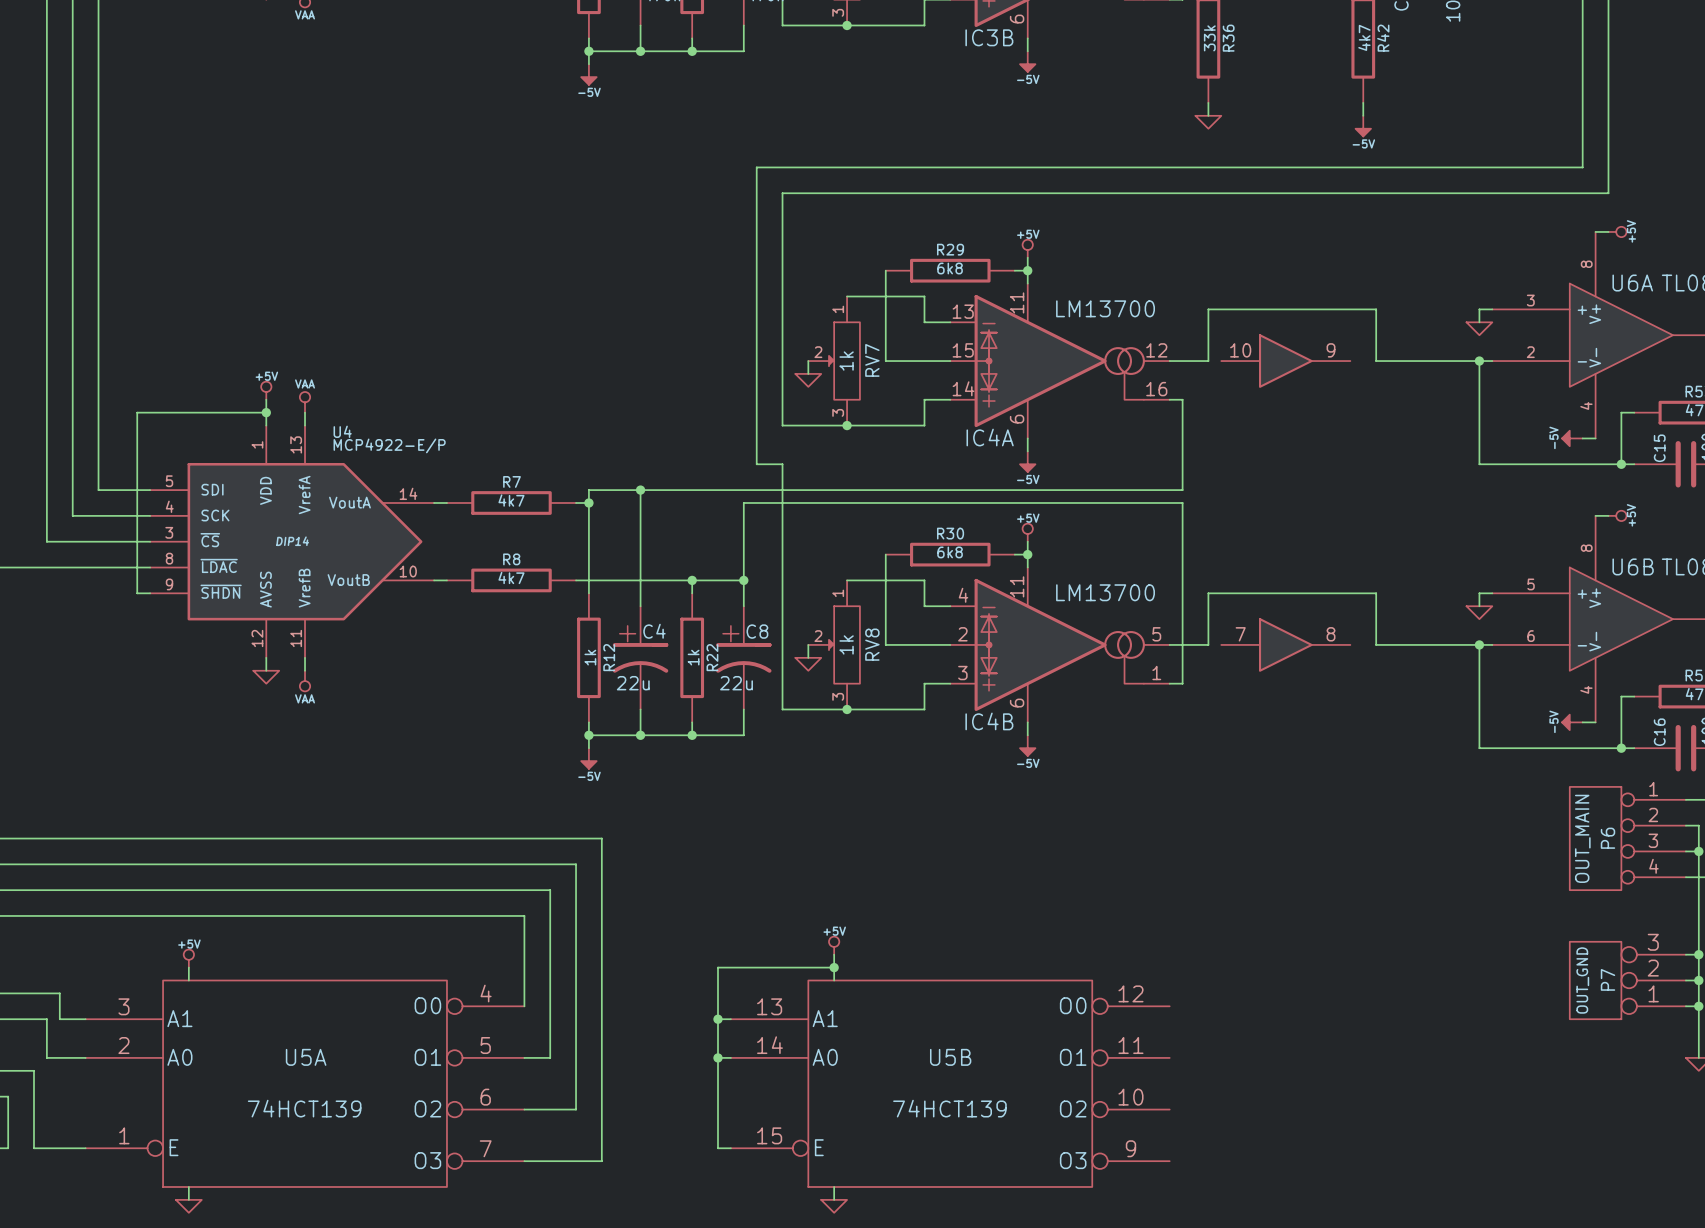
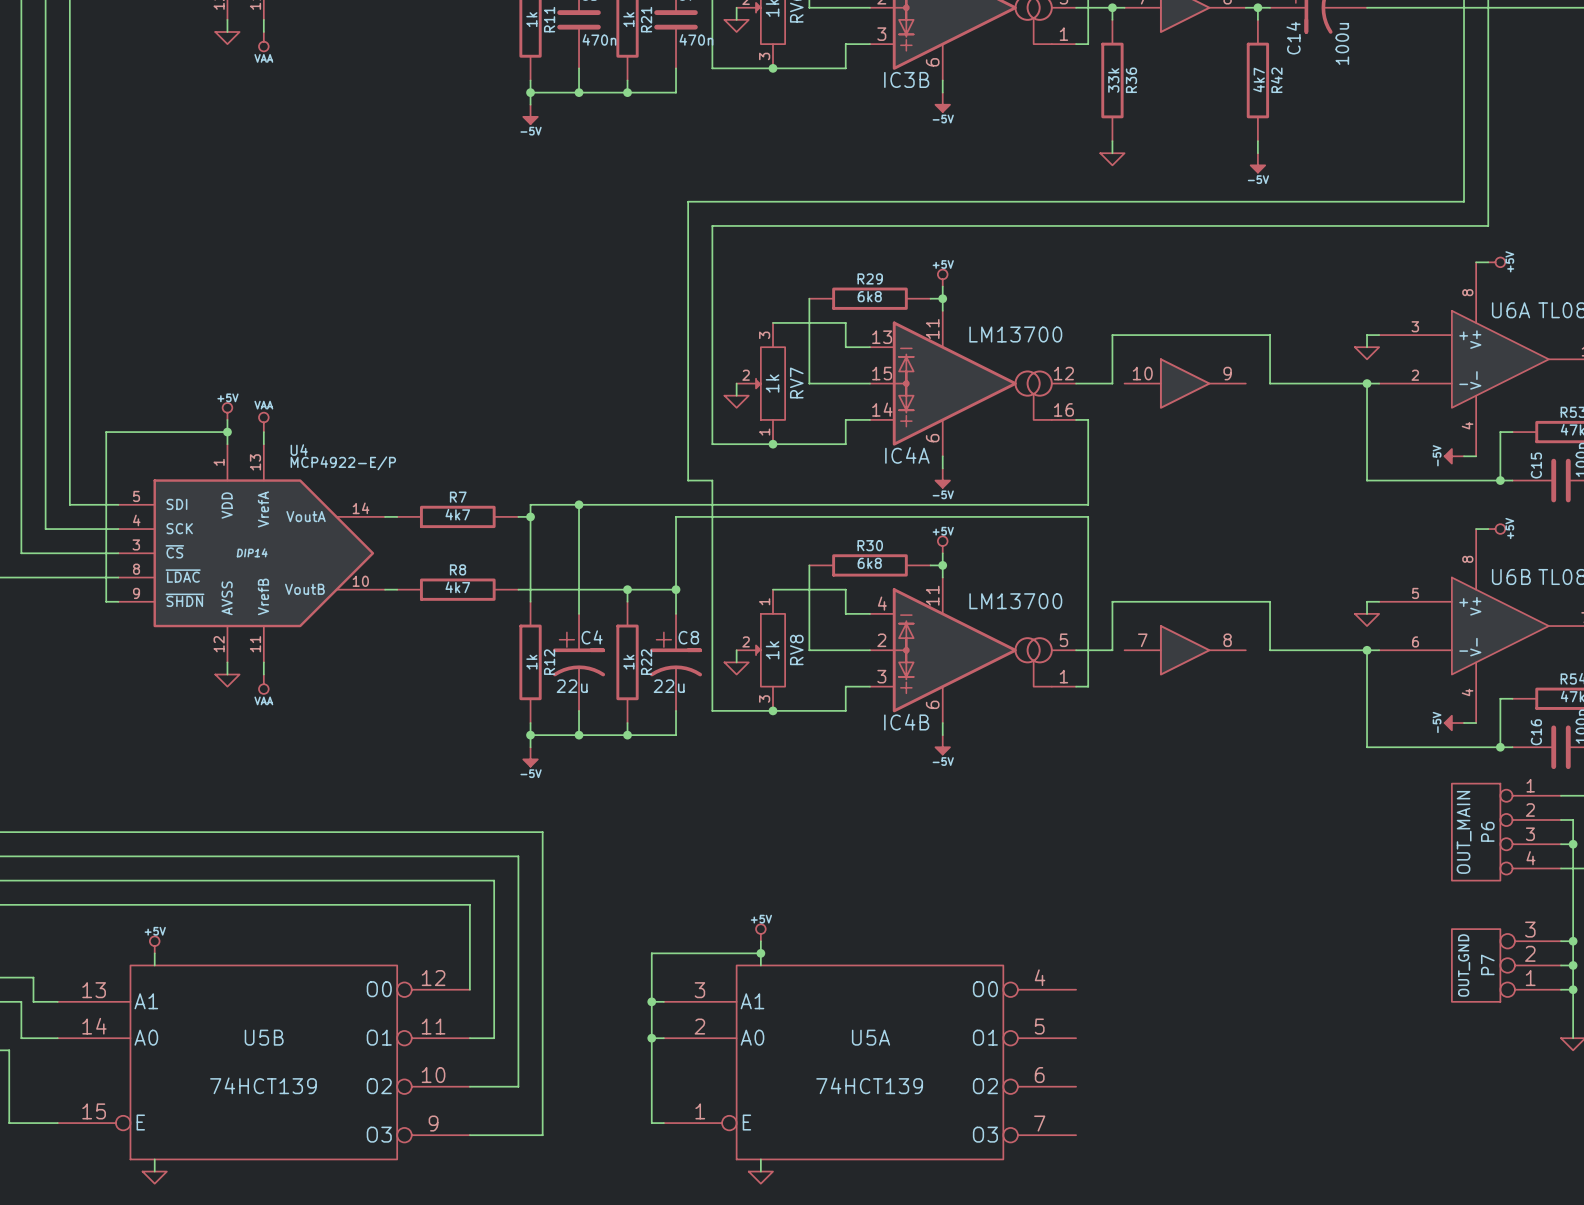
RV7 flip: as is (844, 361) -> up-down (770, 383)
U5A position: (305, 1083) -> (869, 1062)
U5B position: (950, 1083) -> (263, 1062)

